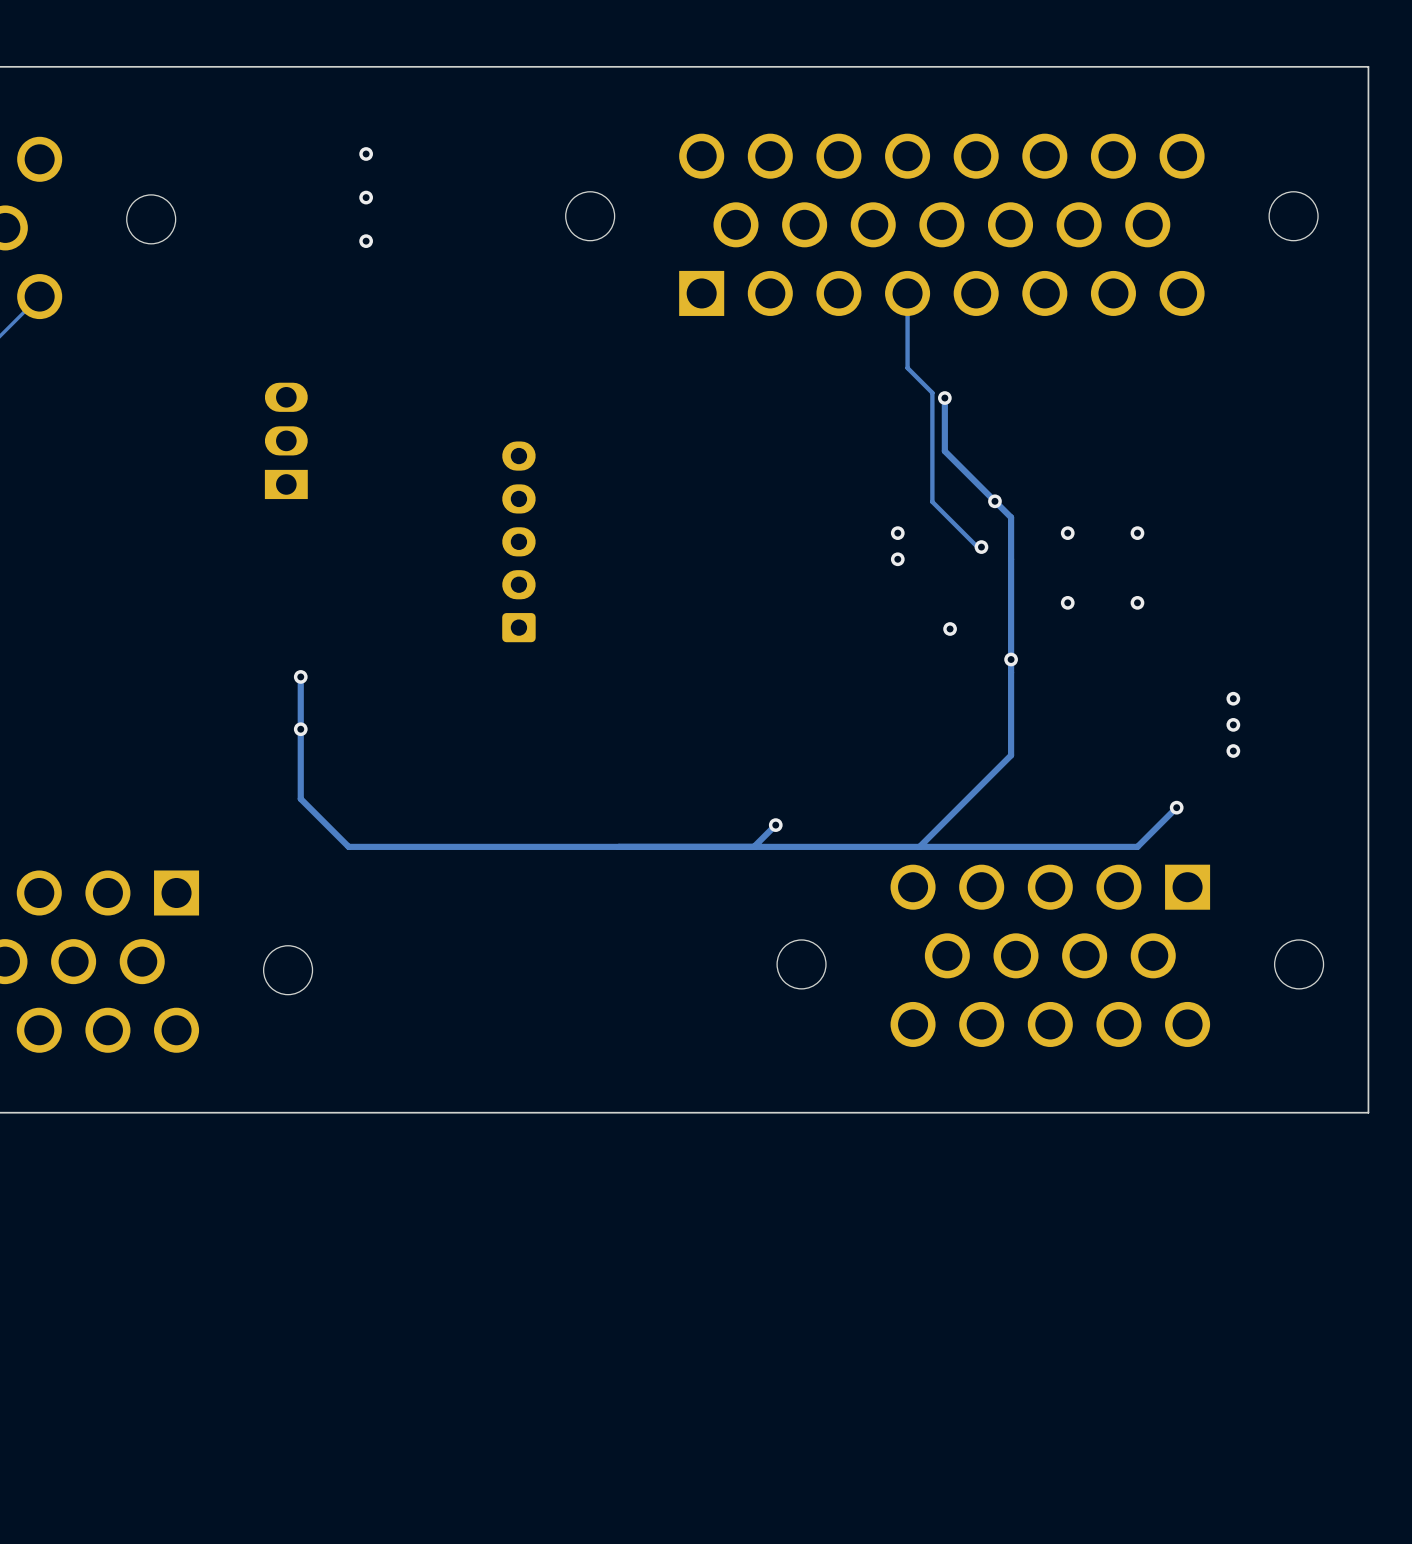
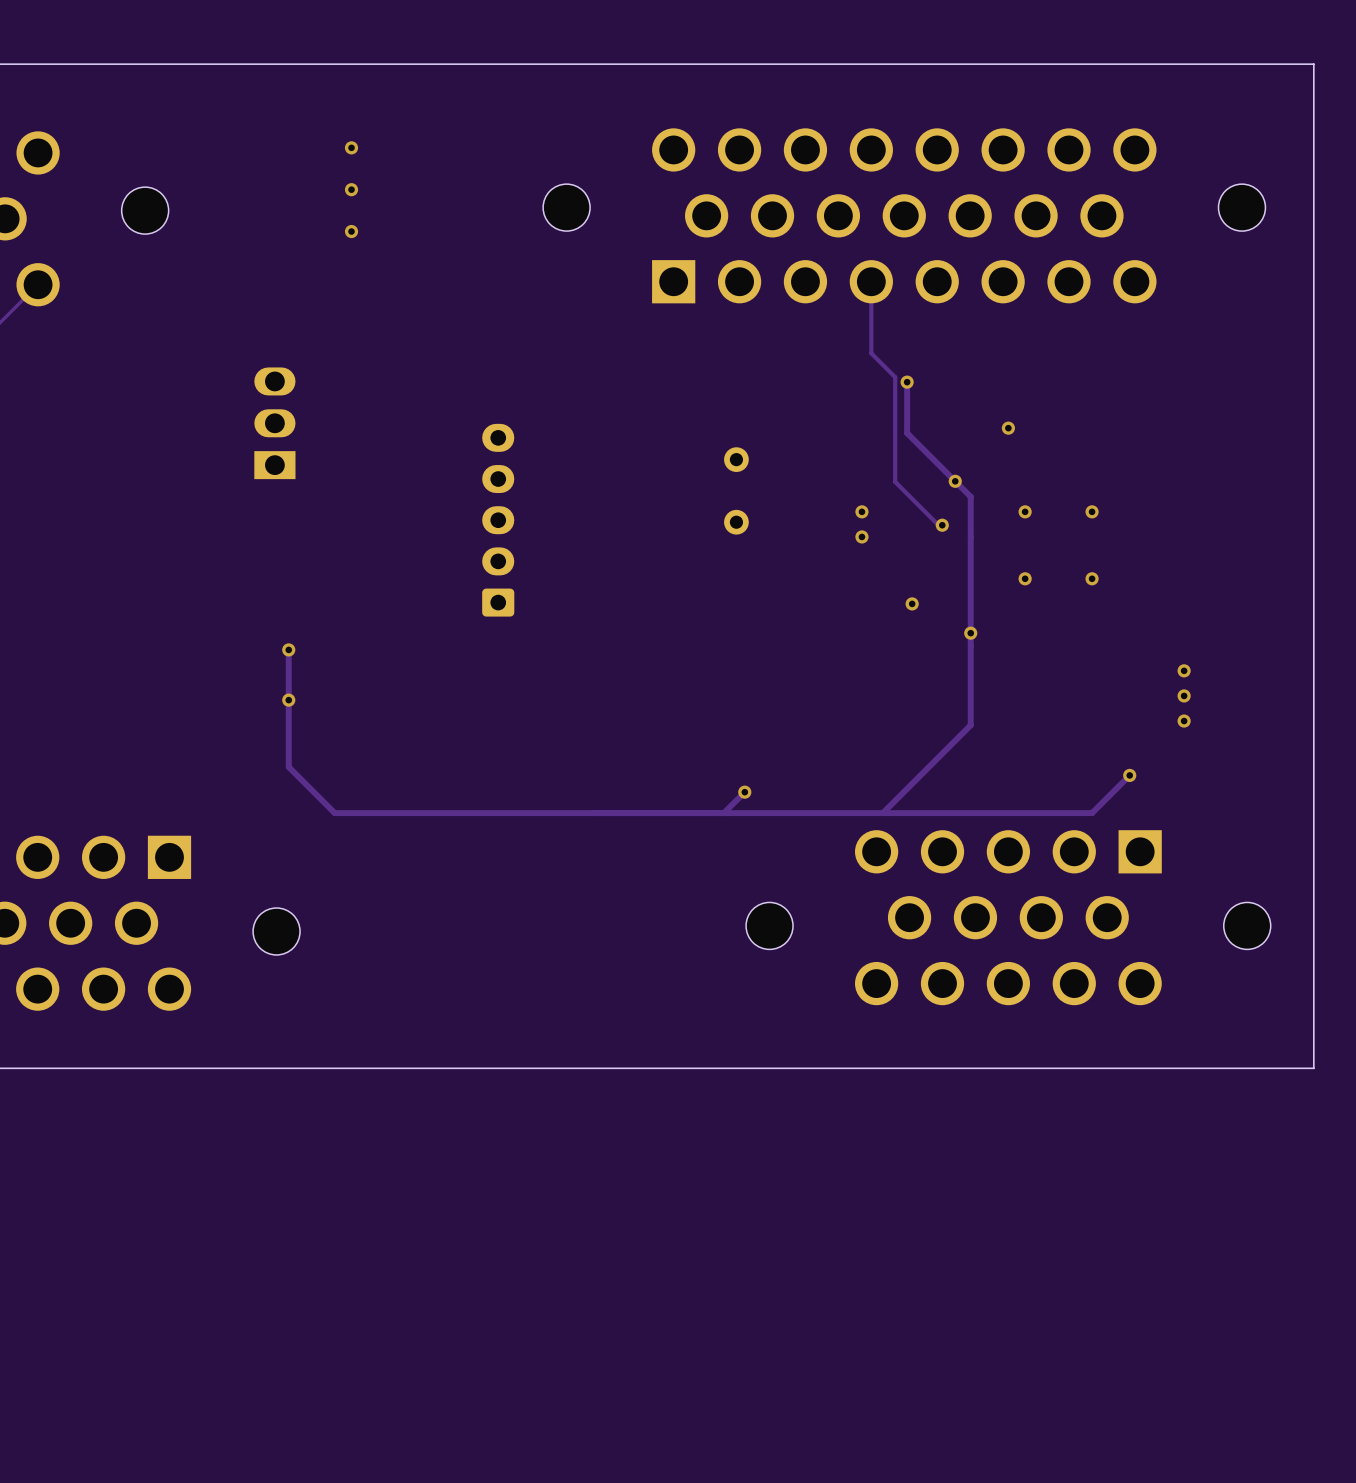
via: none -> (1008, 428)
part: none -> (736, 490)

